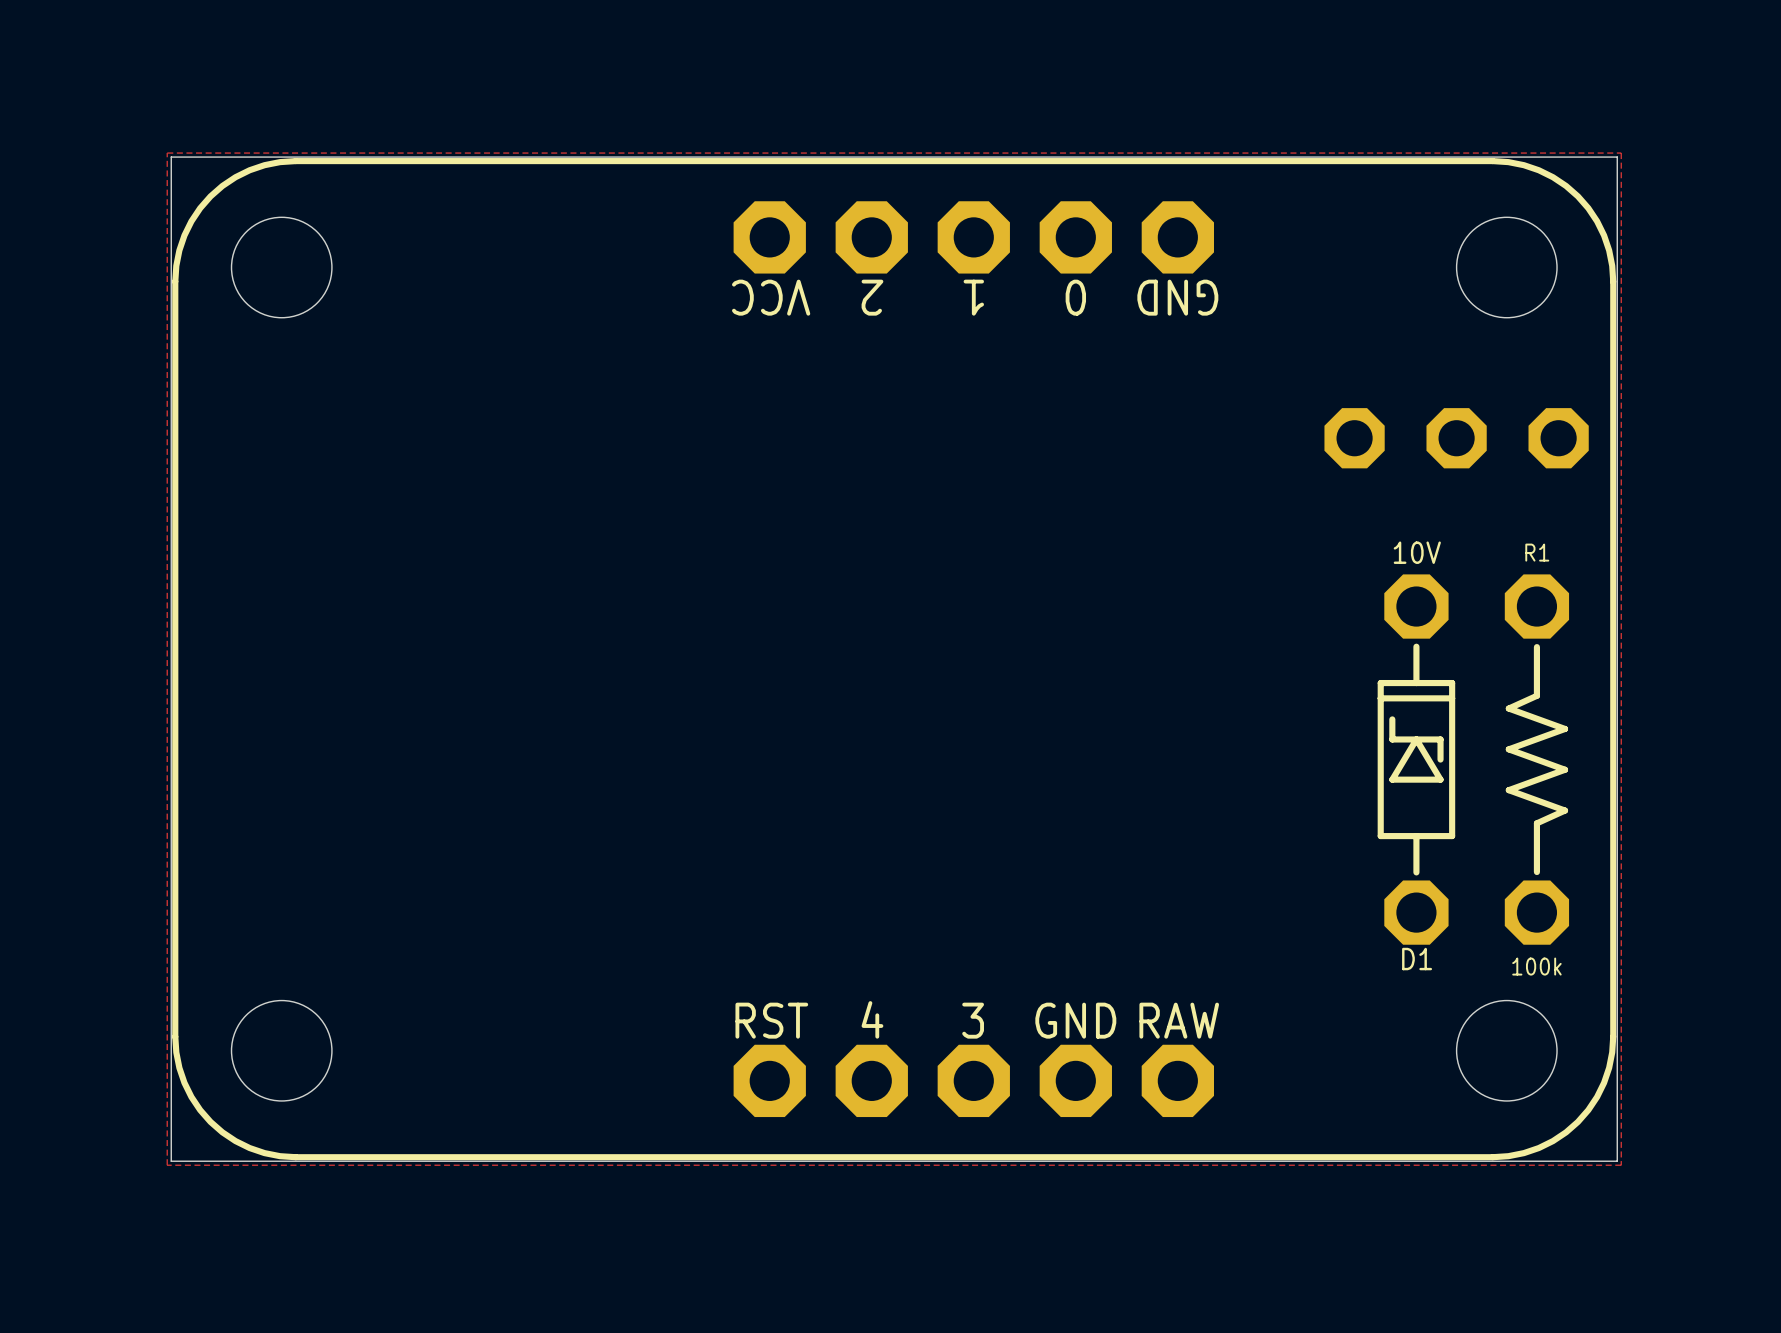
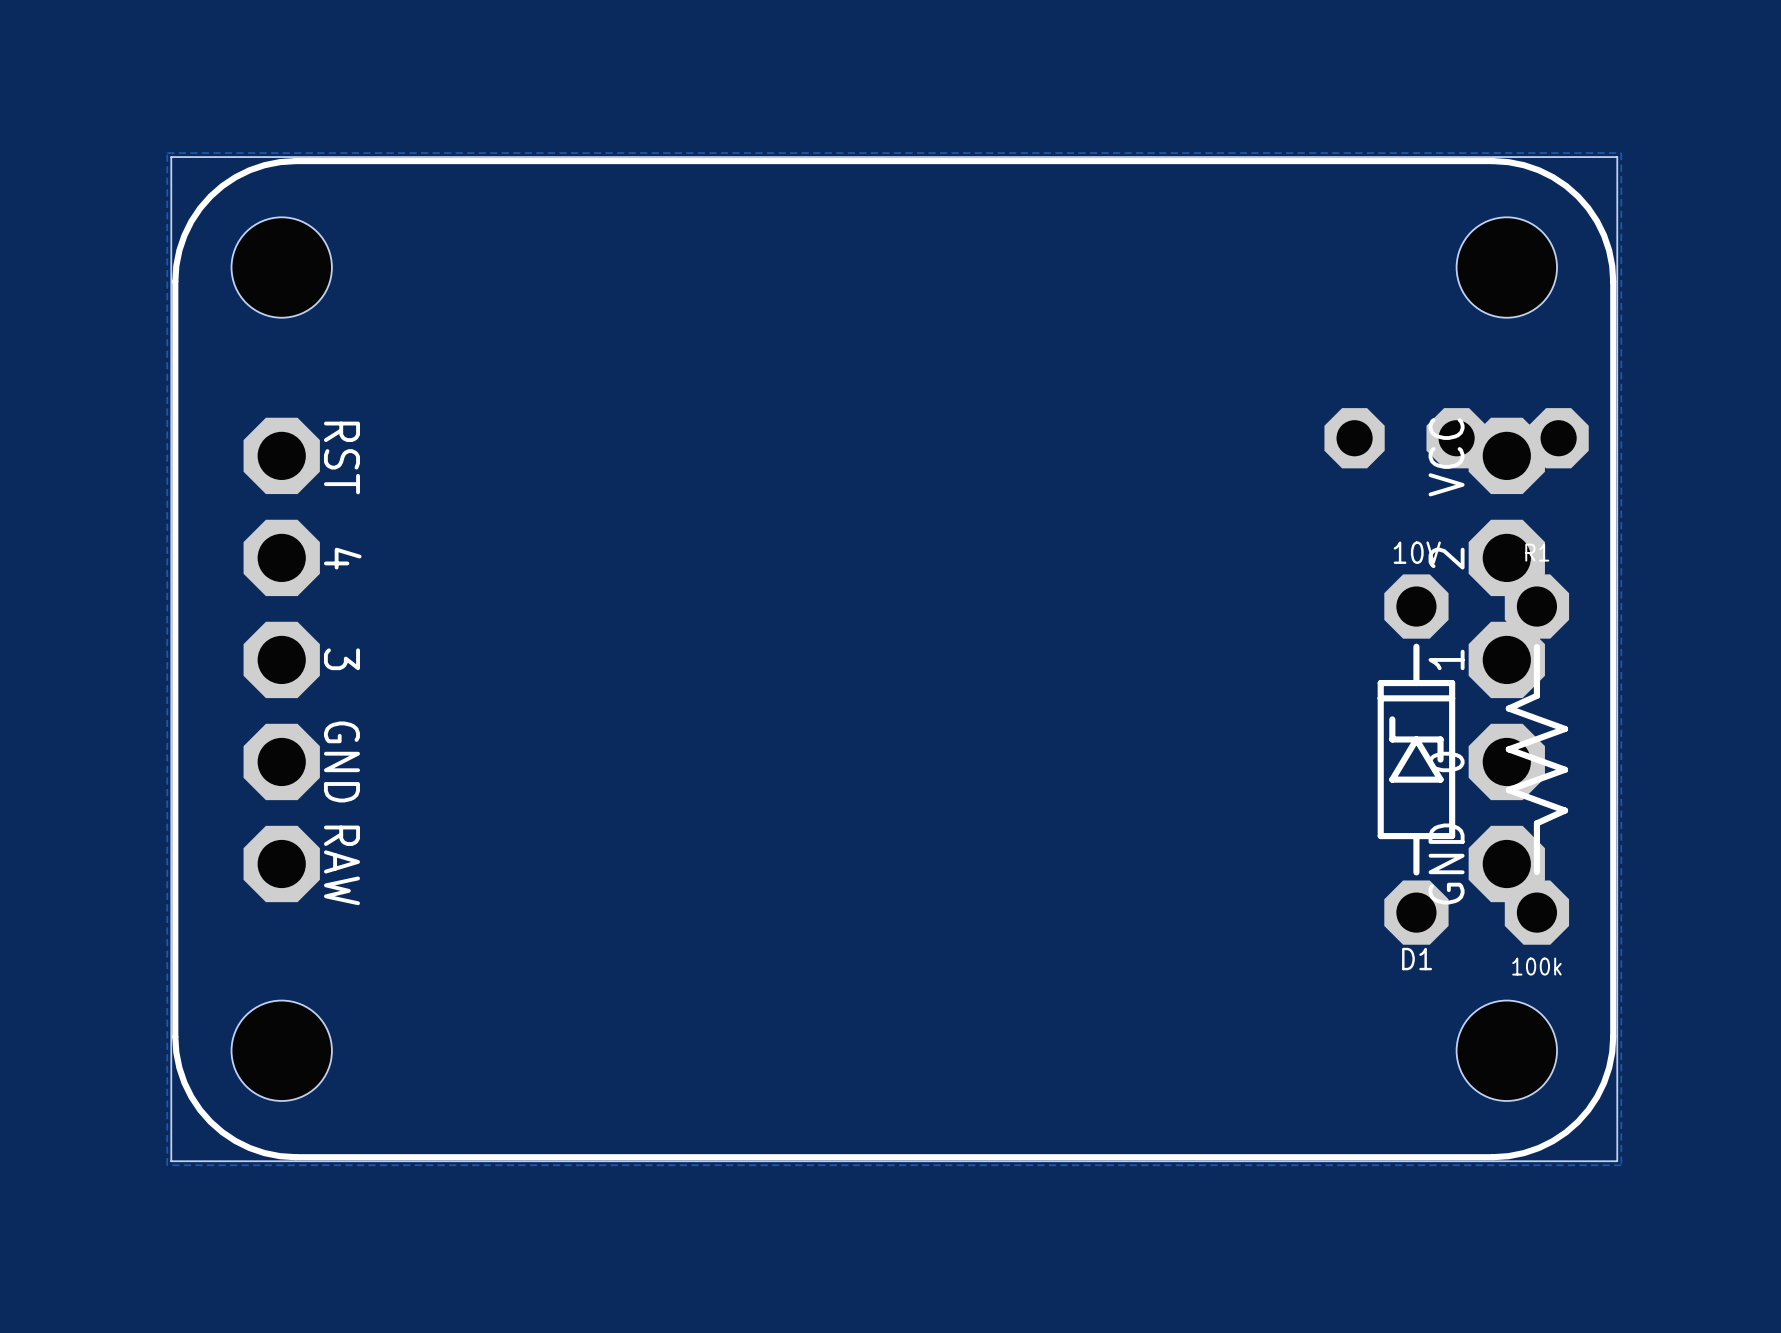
part footprint: [172, 158, 1617, 1161] -> [172, 158, 1617, 1161]

